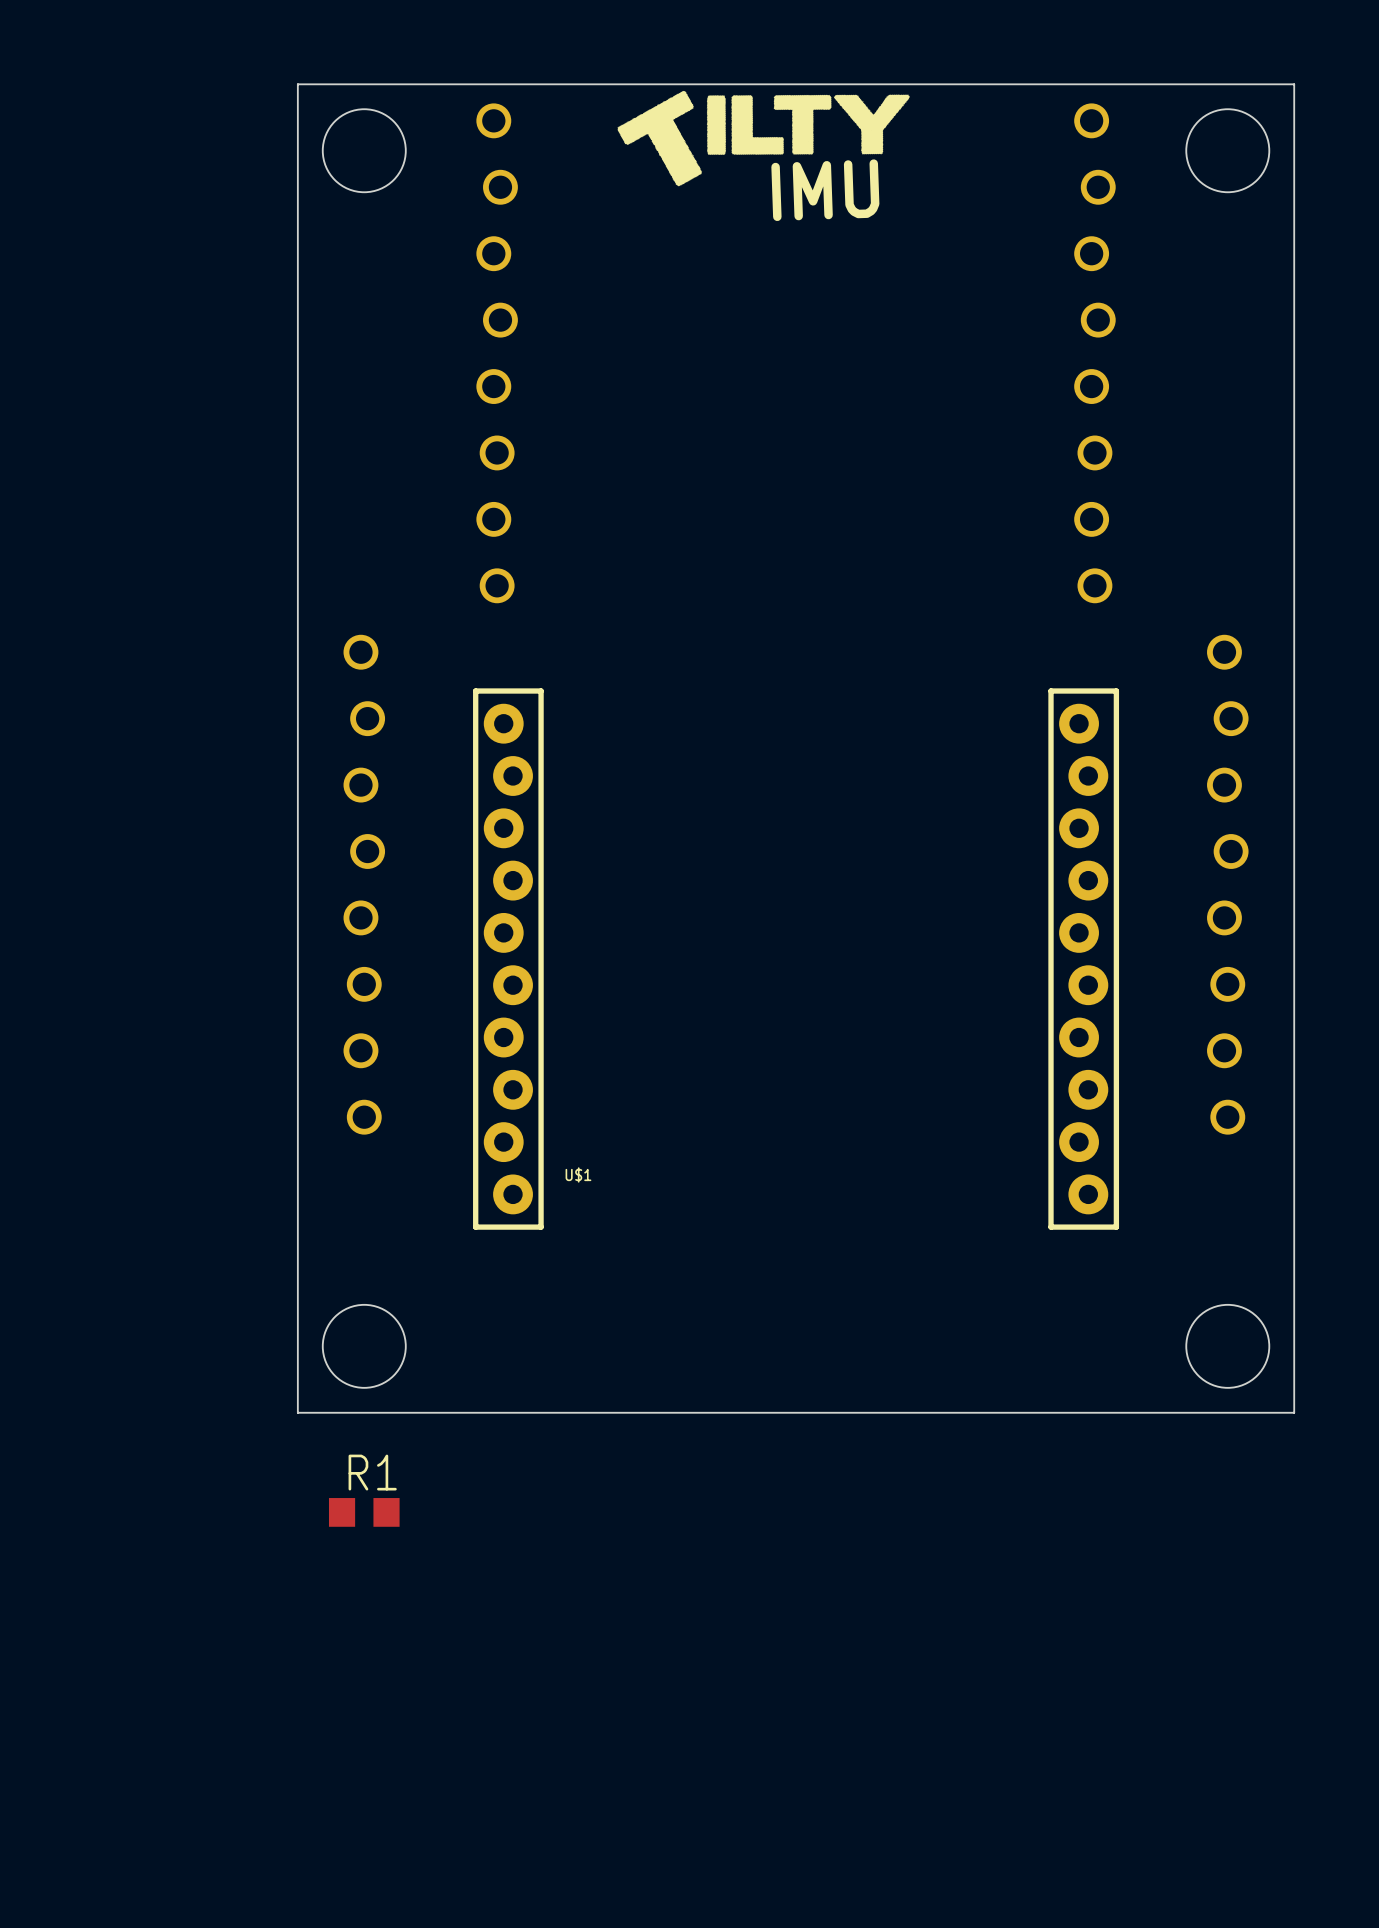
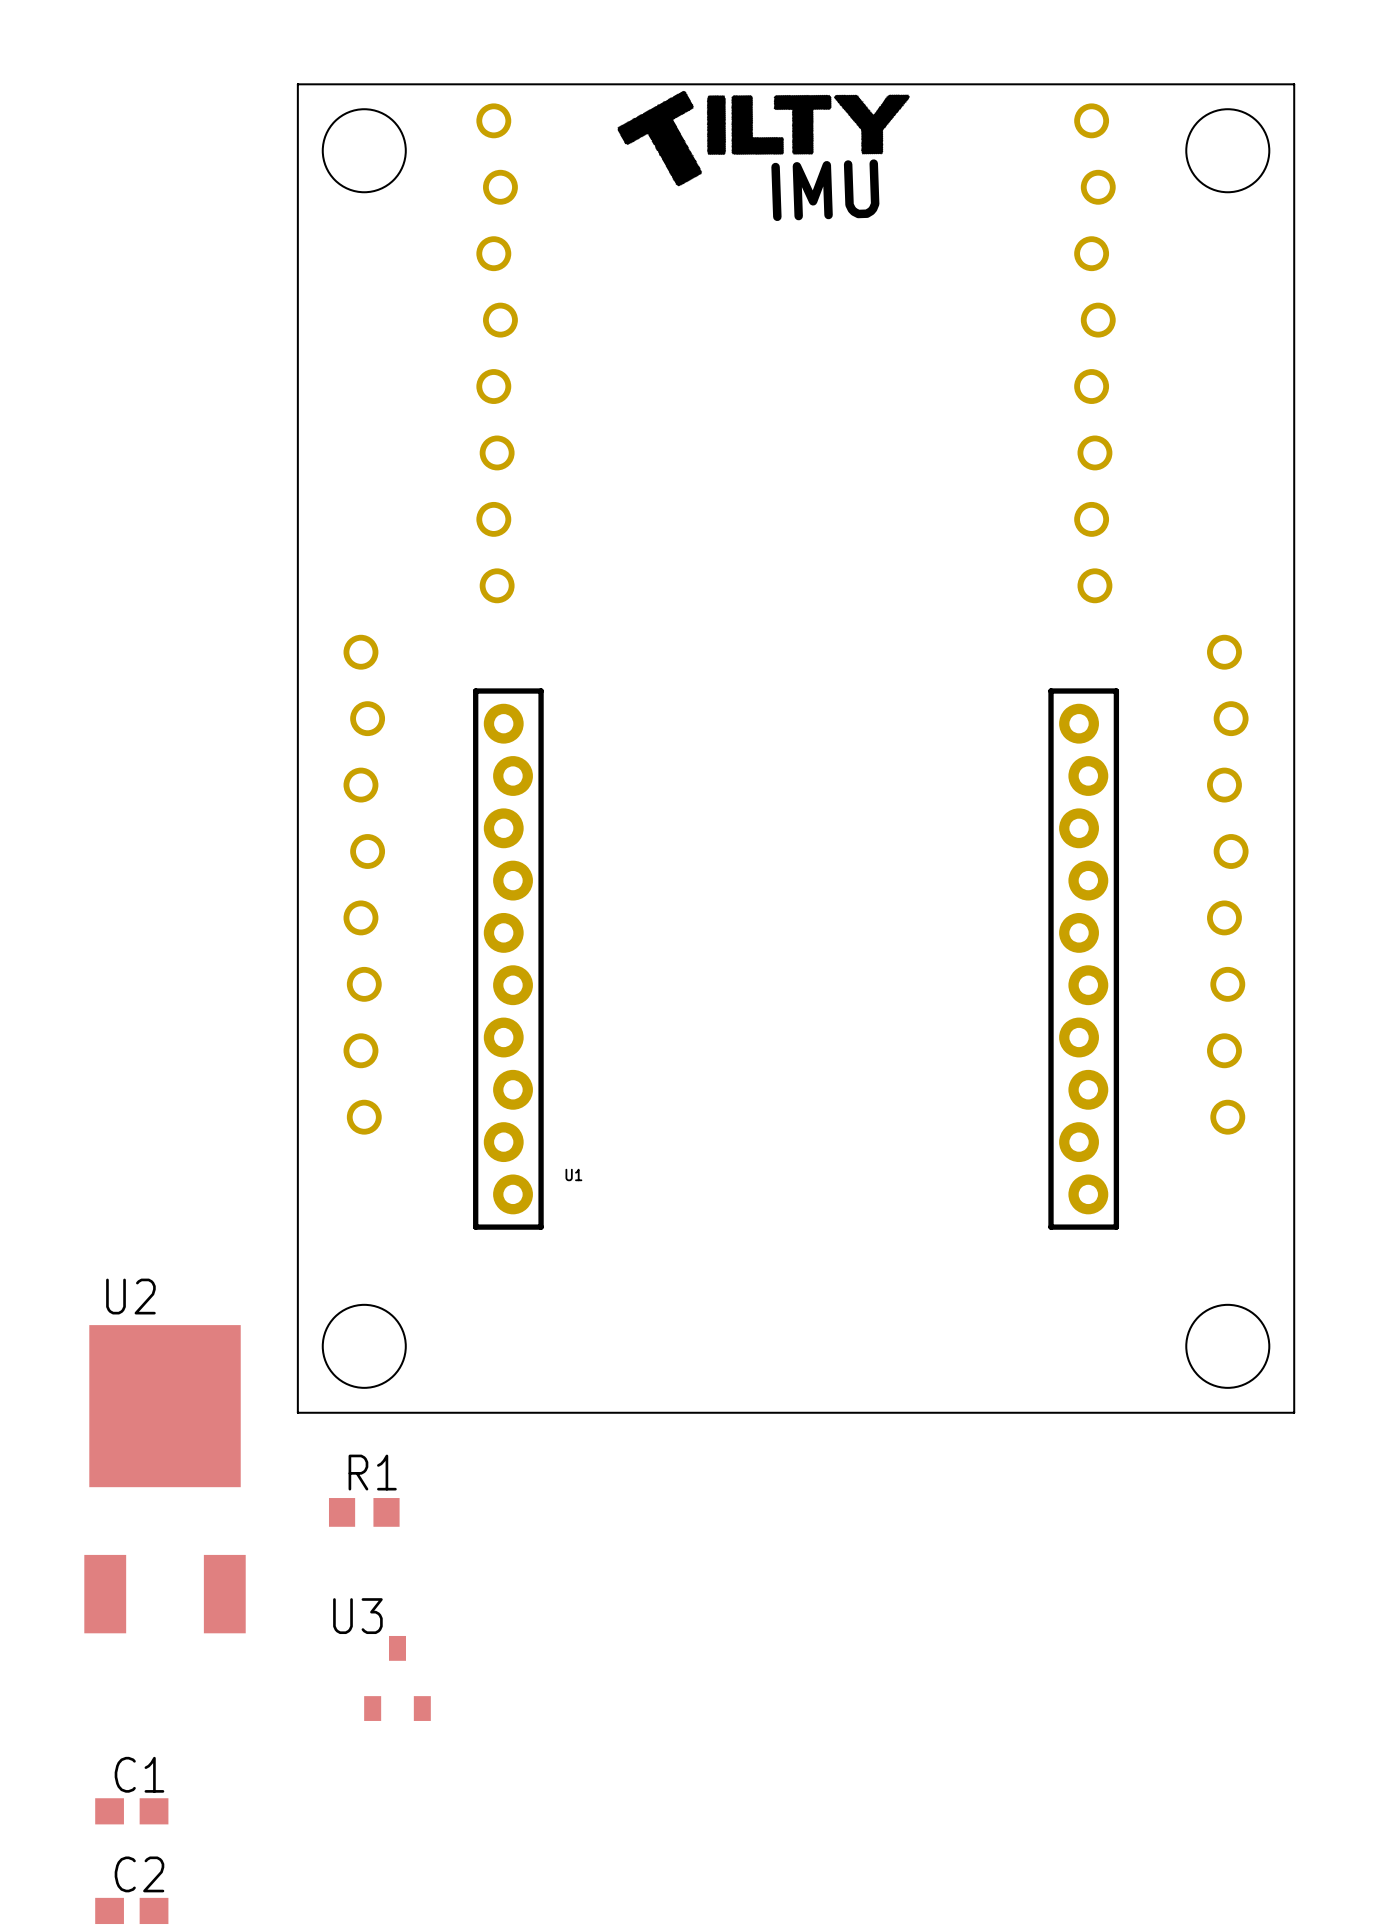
U$1 name: U$1 (578, 1174) -> U1 (573, 1174)
U2: none -> (165, 1479)
U3: none -> (397, 1678)
C1: none -> (131, 1811)
C2: none -> (131, 1910)

